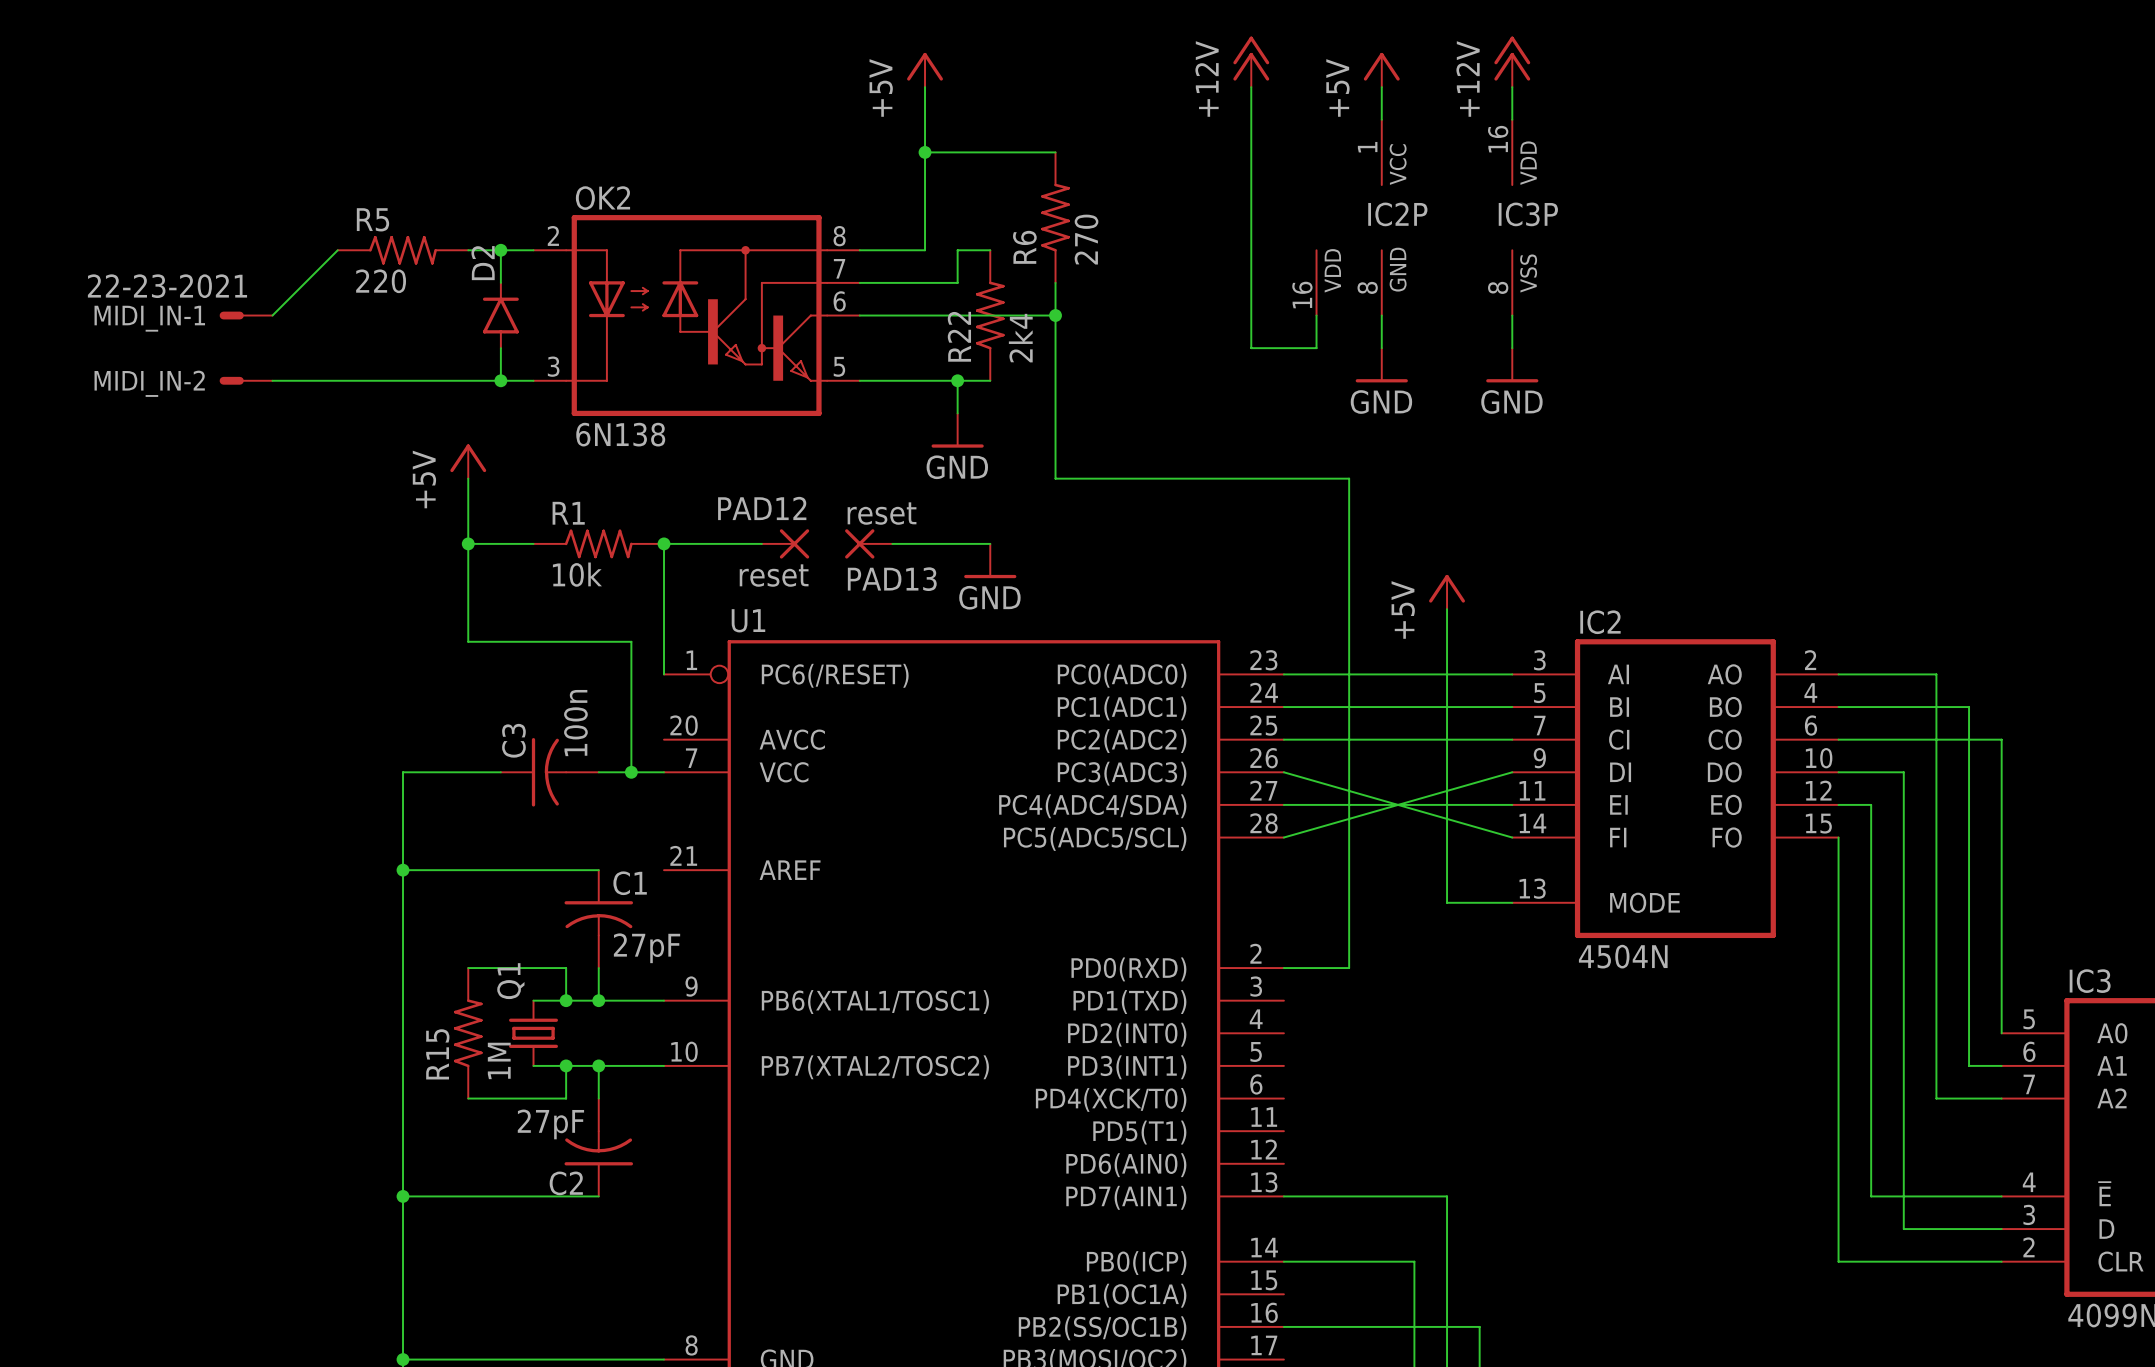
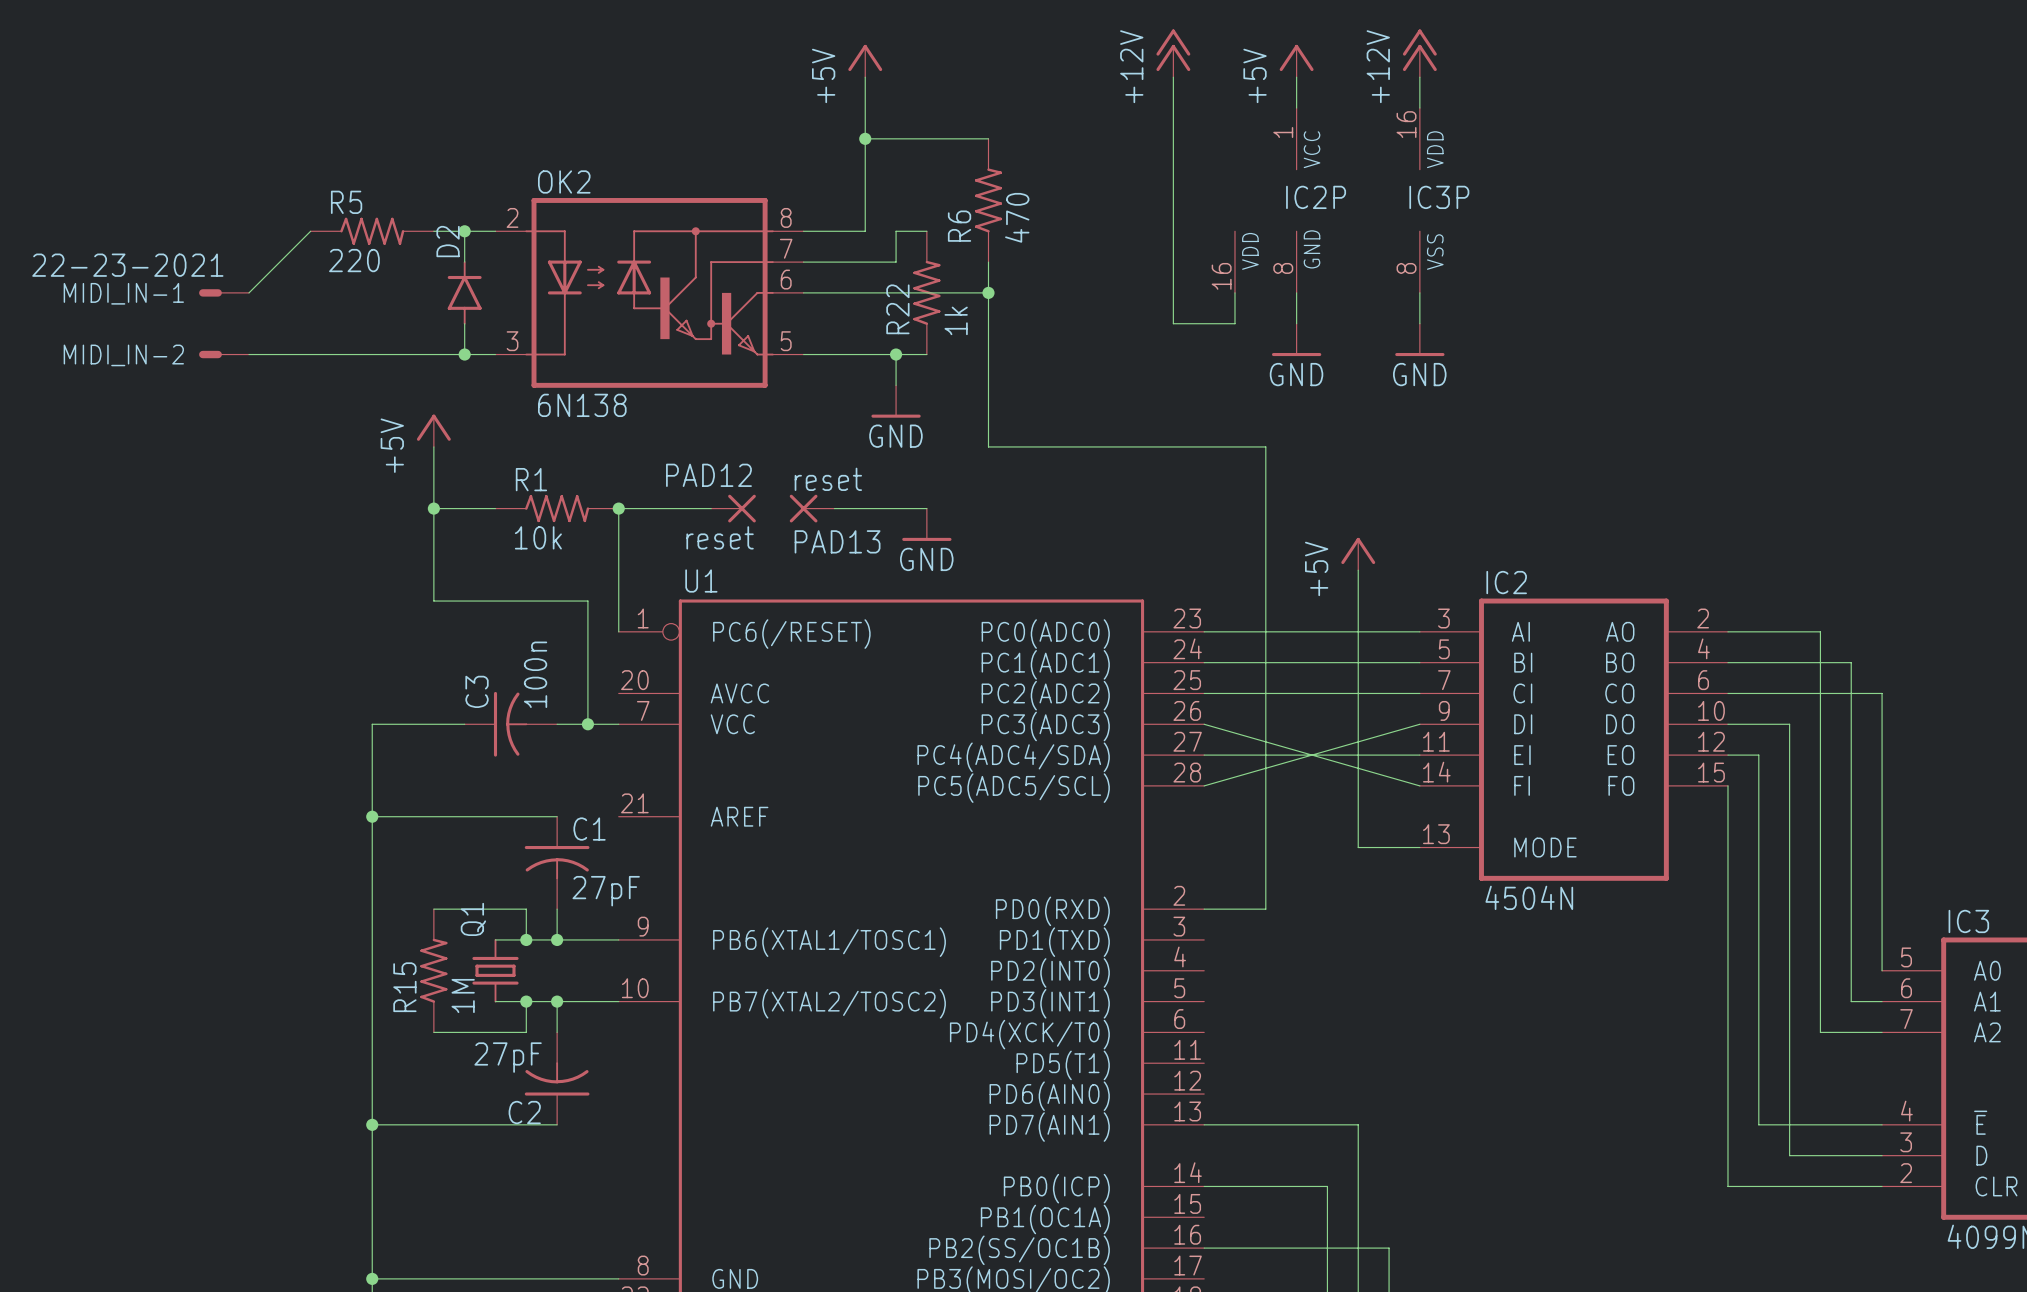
R6 value: 270 (1086, 239) -> 470 (1017, 217)
R22 value: 2k4 (1020, 338) -> 1k (956, 320)

